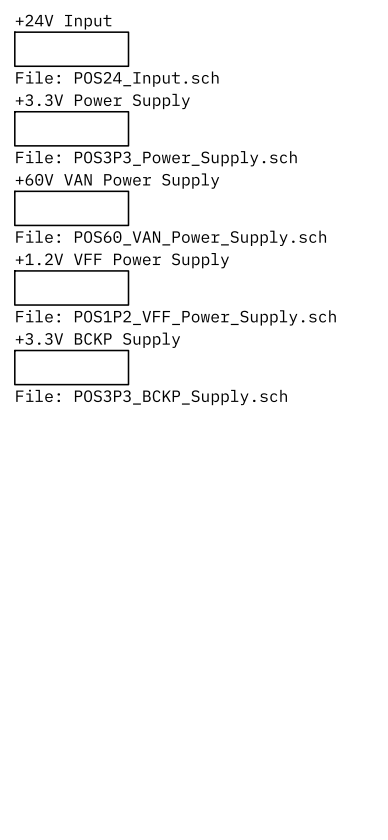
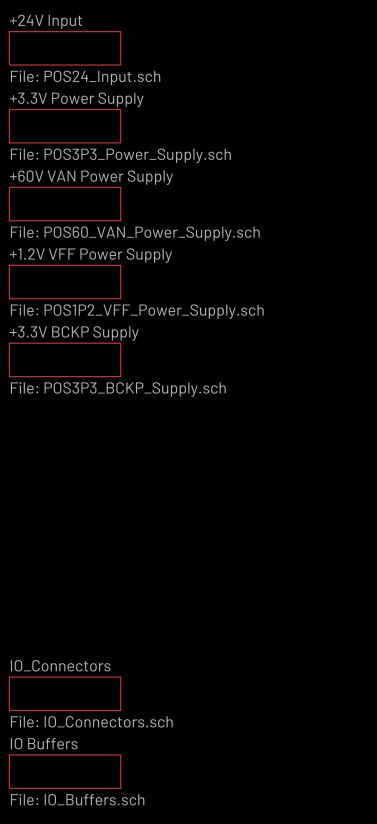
sheet IO_Connectors: none -> File: IO_Connectors.sch (65, 693)
sheet IO Buffers: none -> File: IO_Buffers.sch (65, 771)

